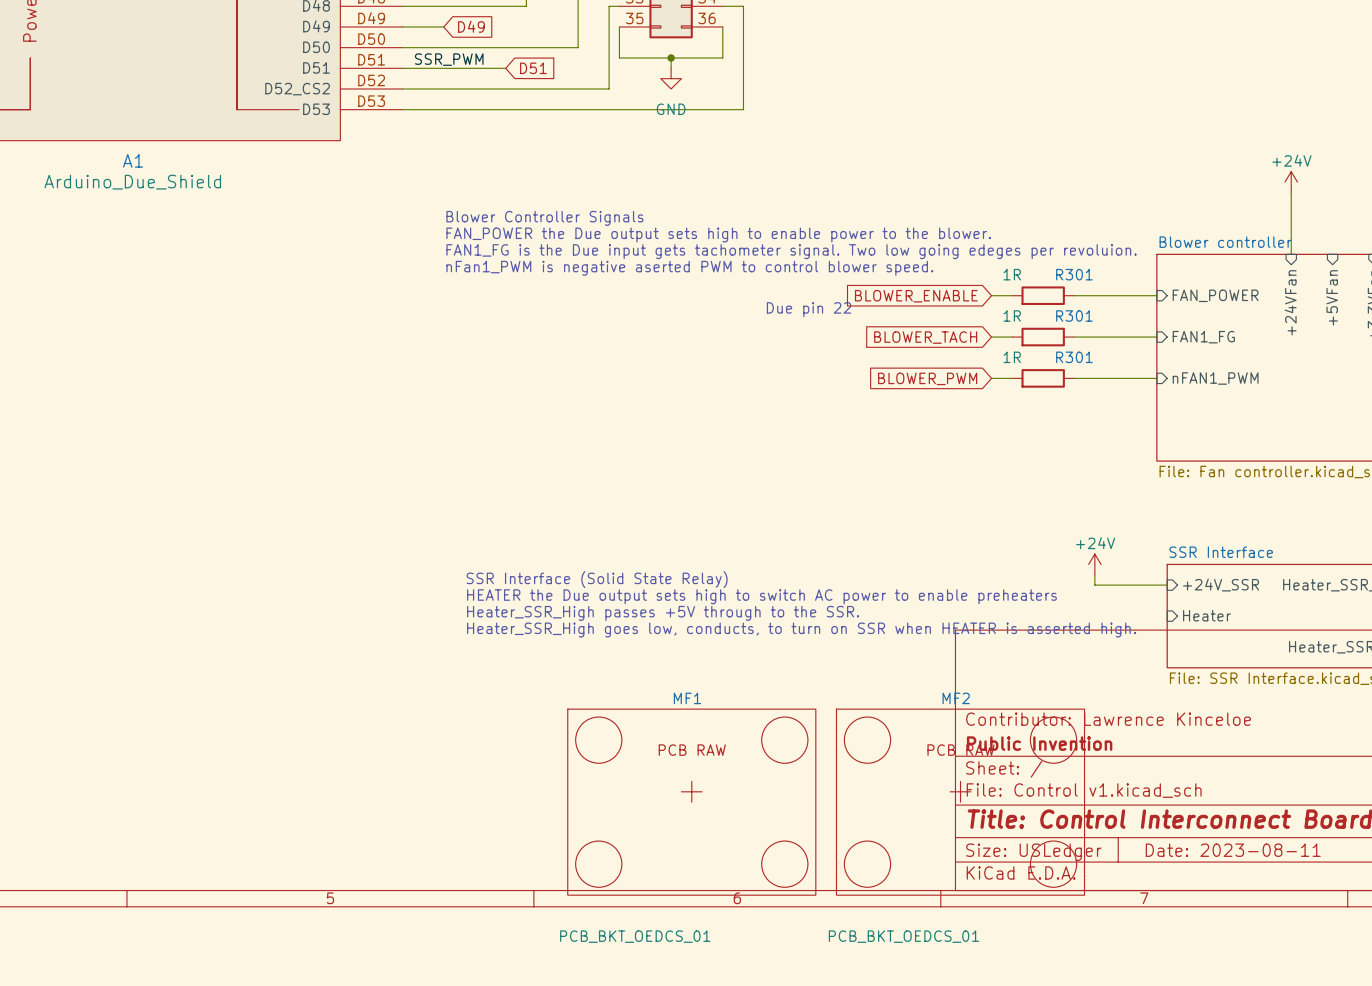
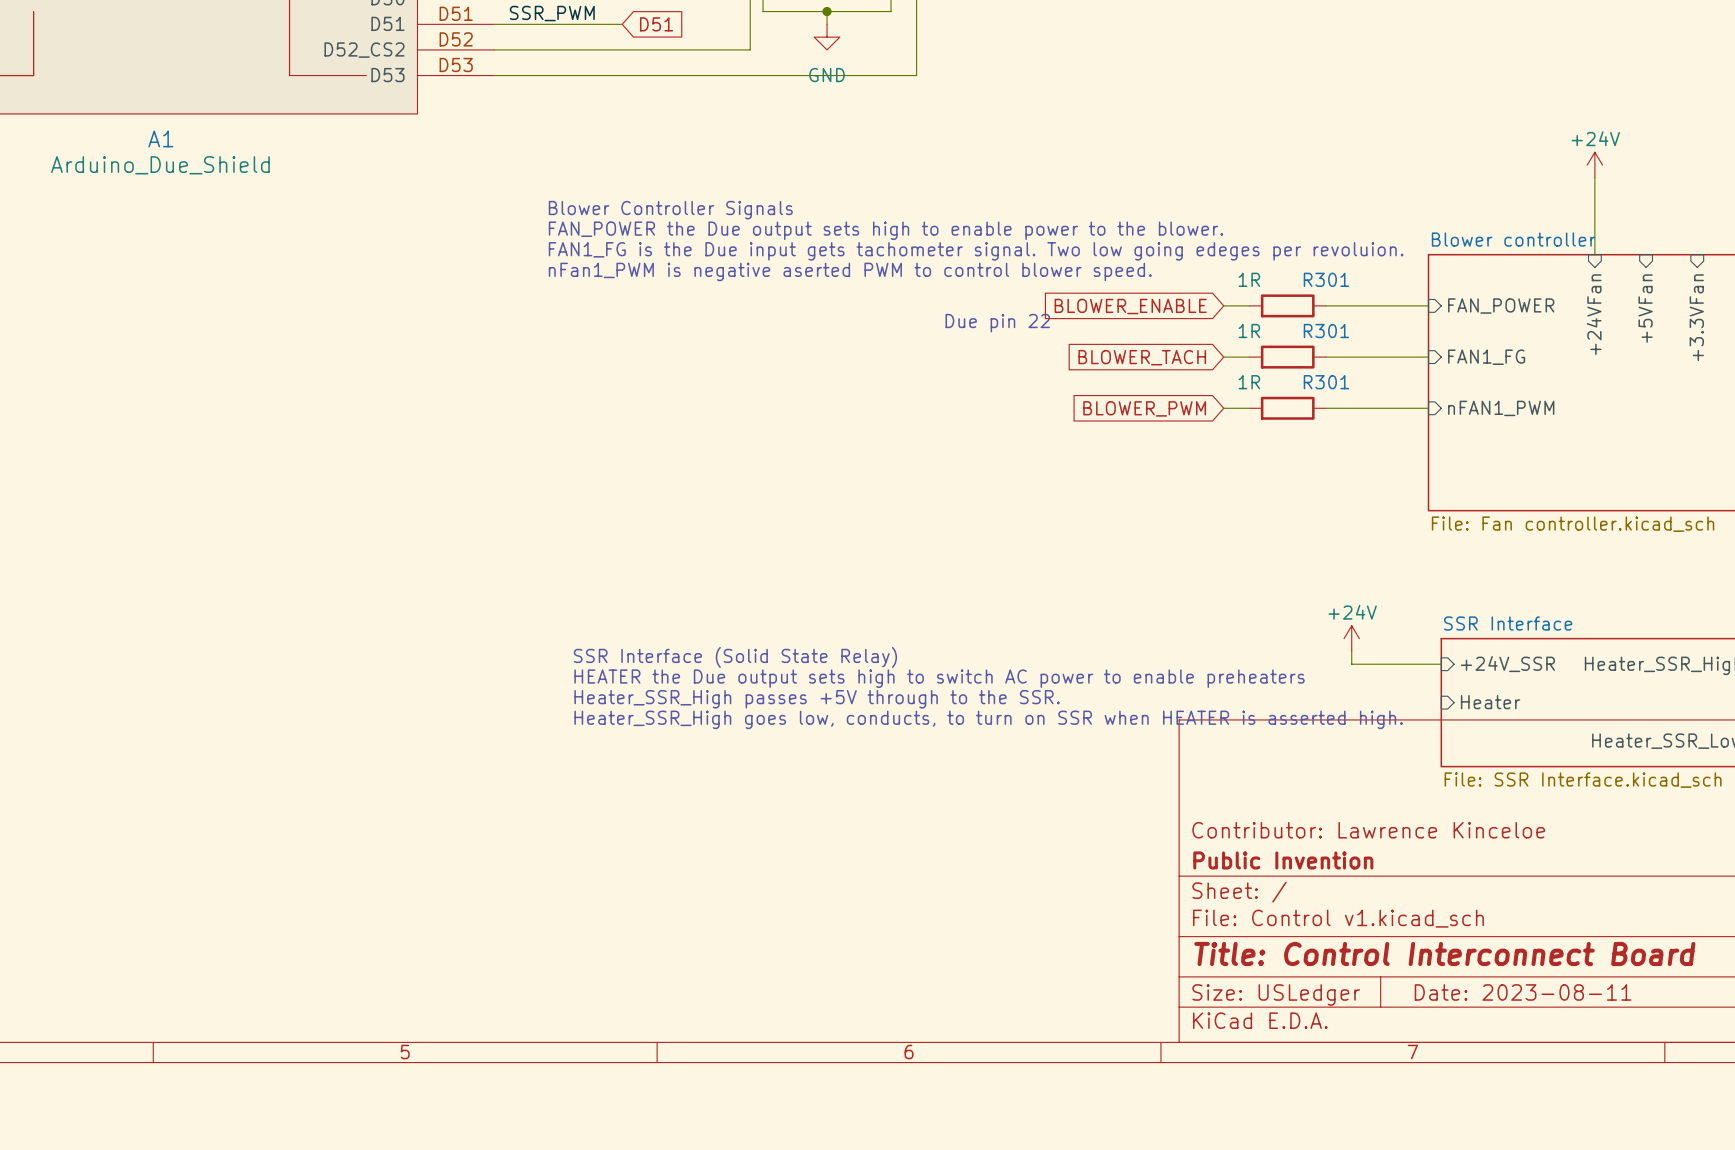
MF1: PCB_BKT_OEDCS_01 (691, 802) -> none
MF2: PCB_BKT_OEDCS_01 (960, 802) -> none

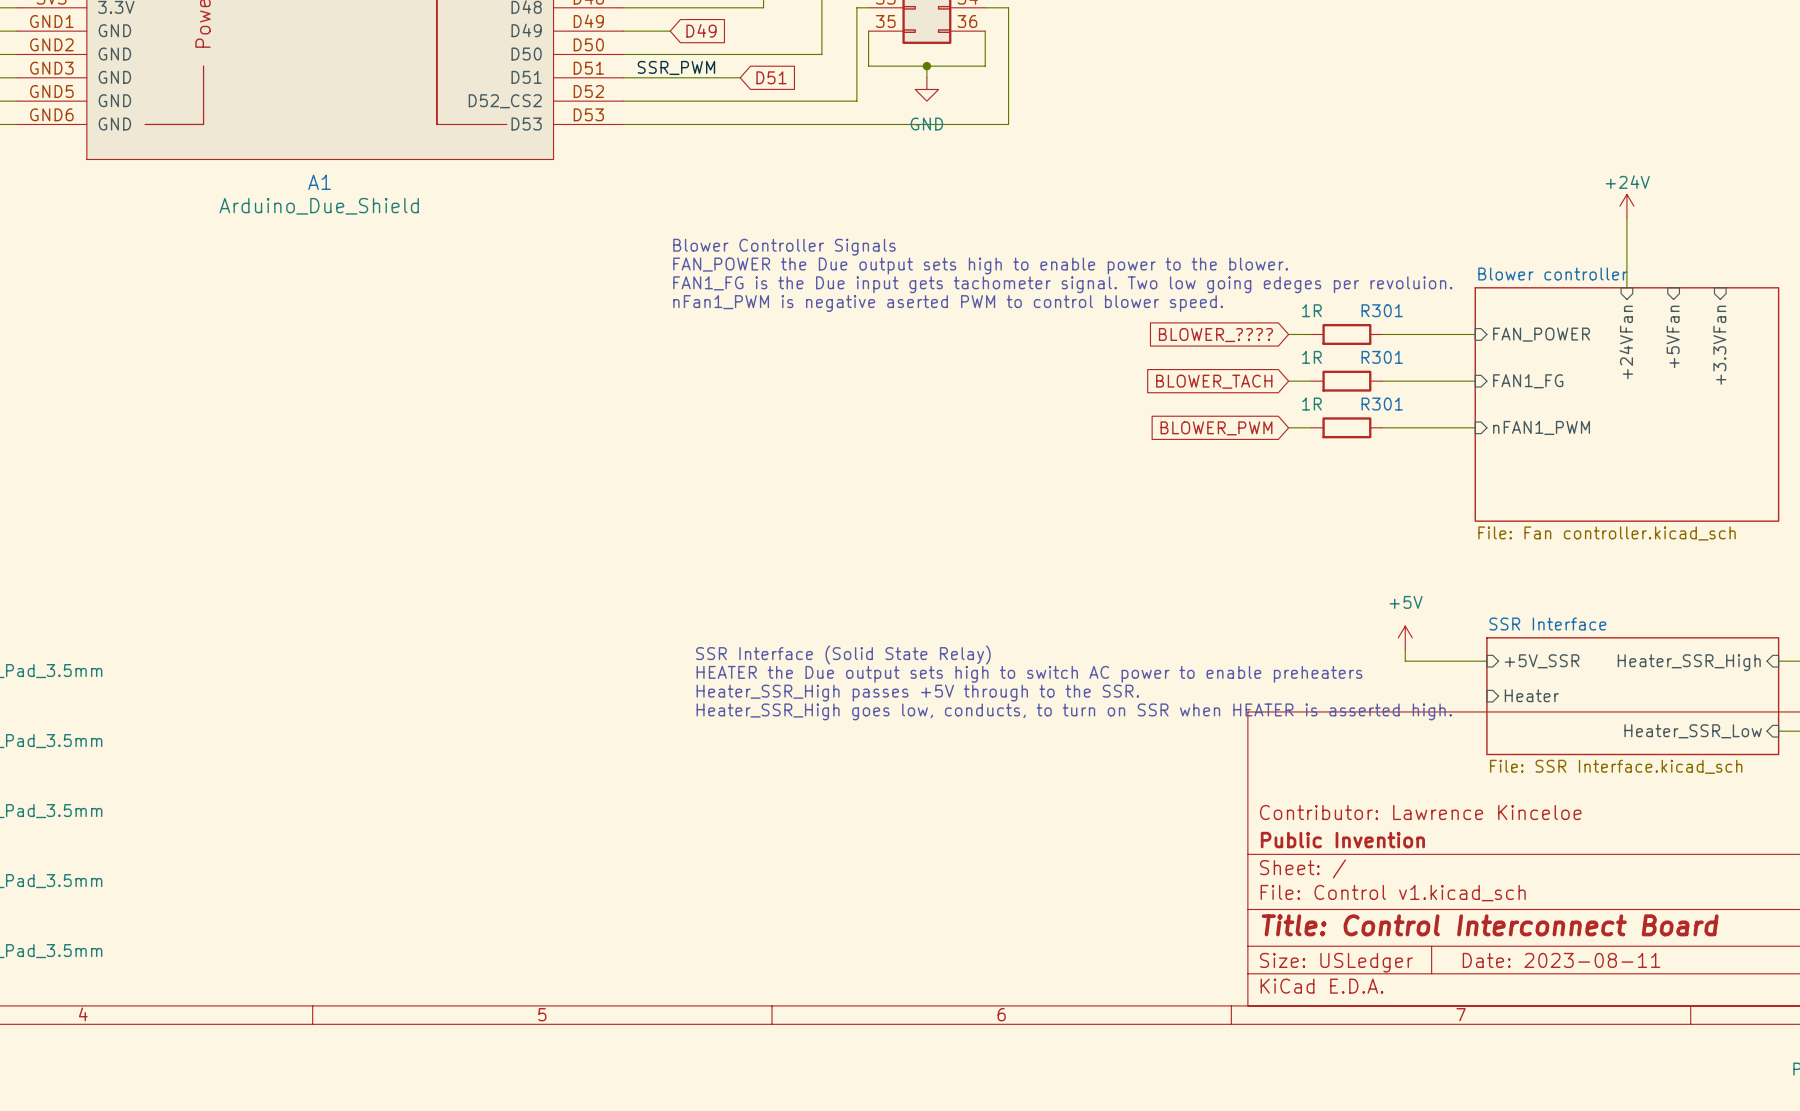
global label: BLOWER_ENABLE (1130, 306) -> BLOWER_???? (1215, 335)
text: Due pin 22 (997, 323) -> none
power symbol: +24V (1351, 638) -> +5V (1405, 637)
sheet pin: +24V_SSR (1507, 664) -> +5V_SSR (1542, 661)

